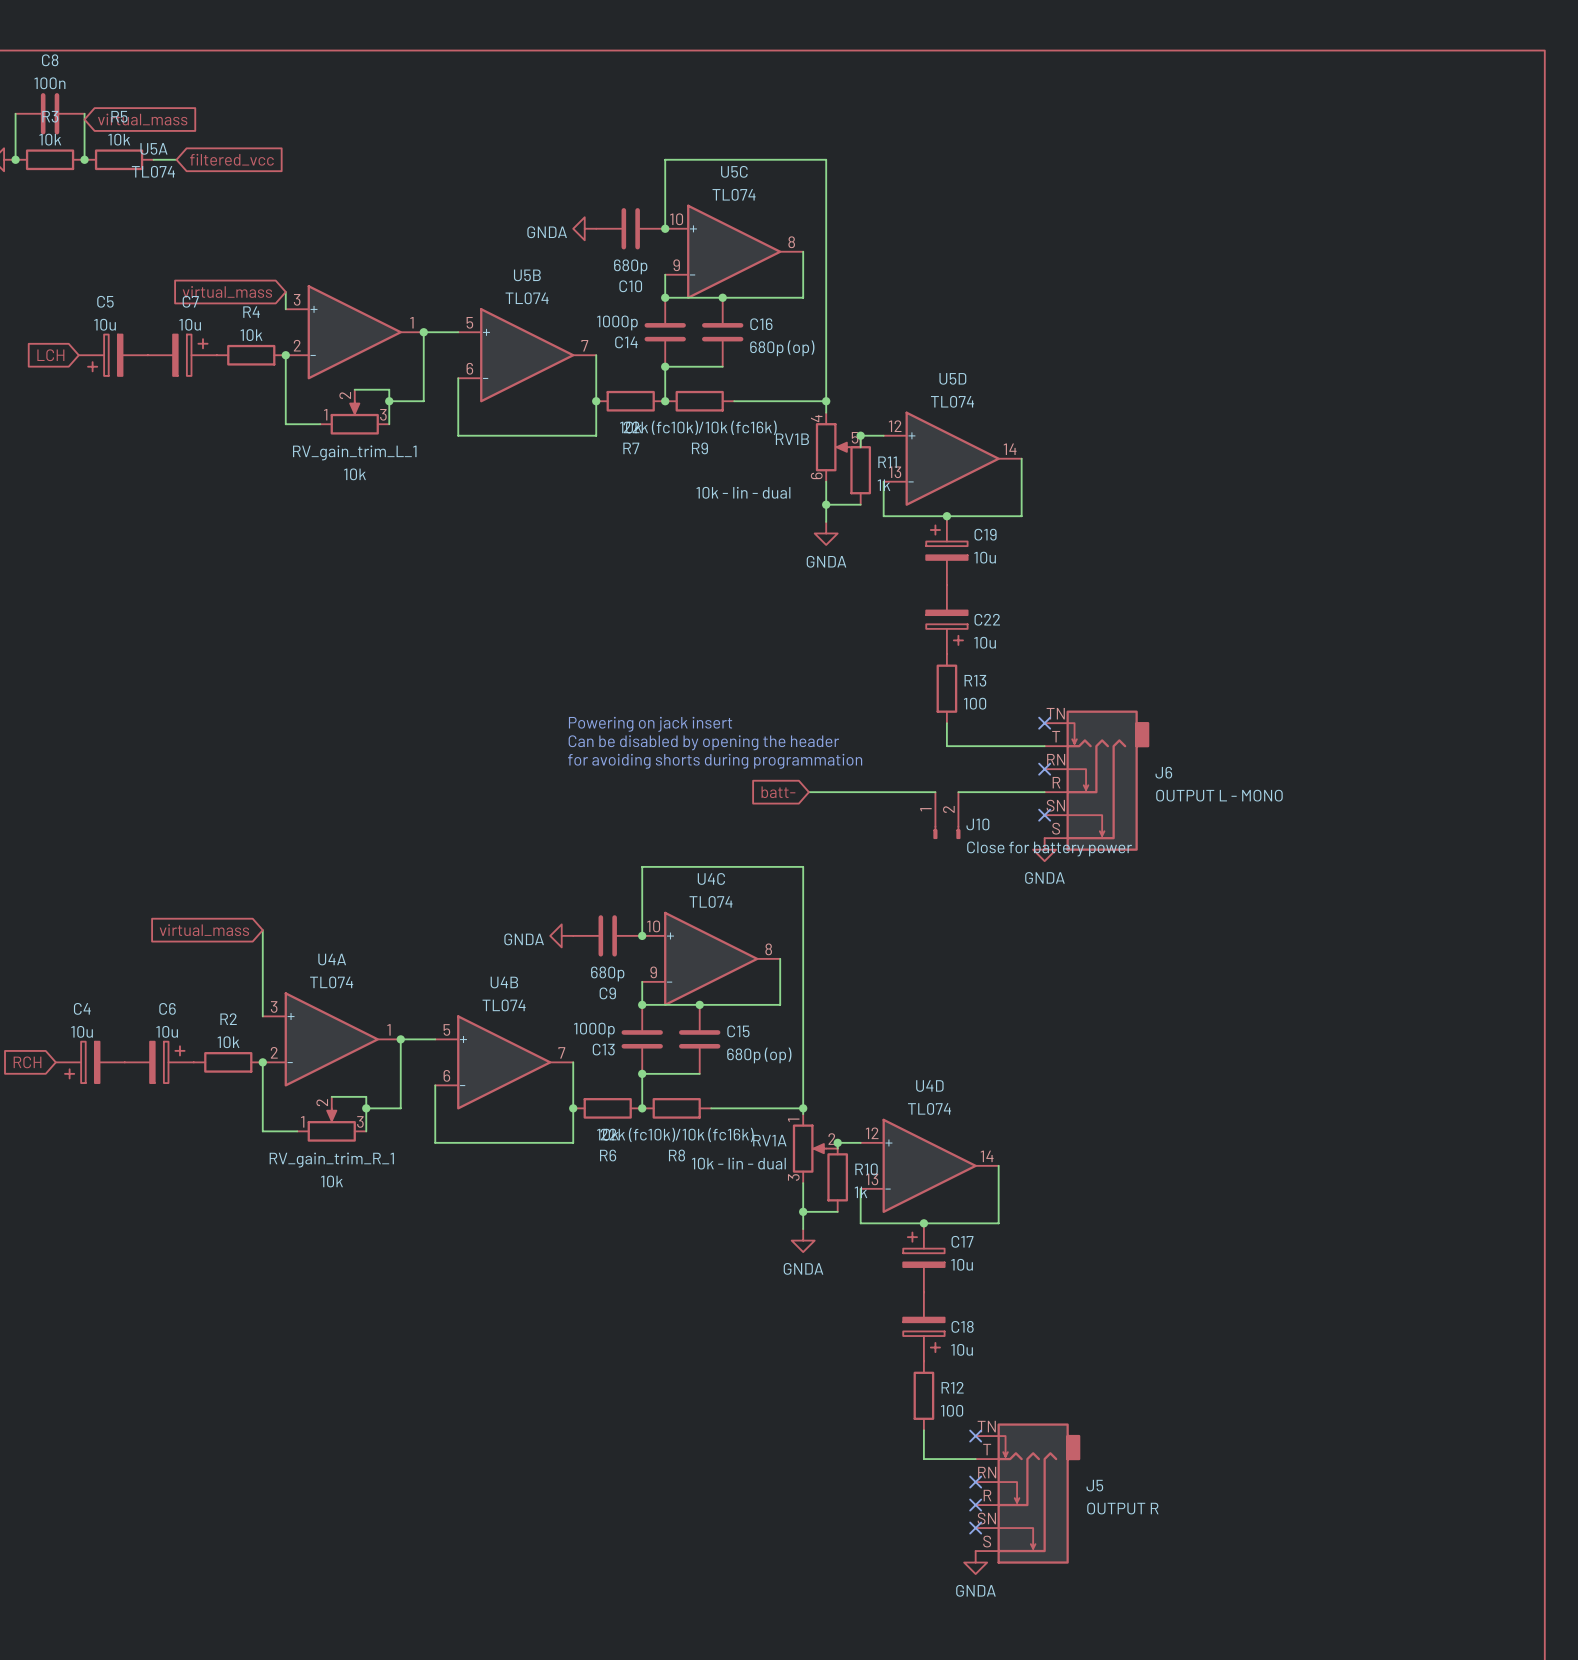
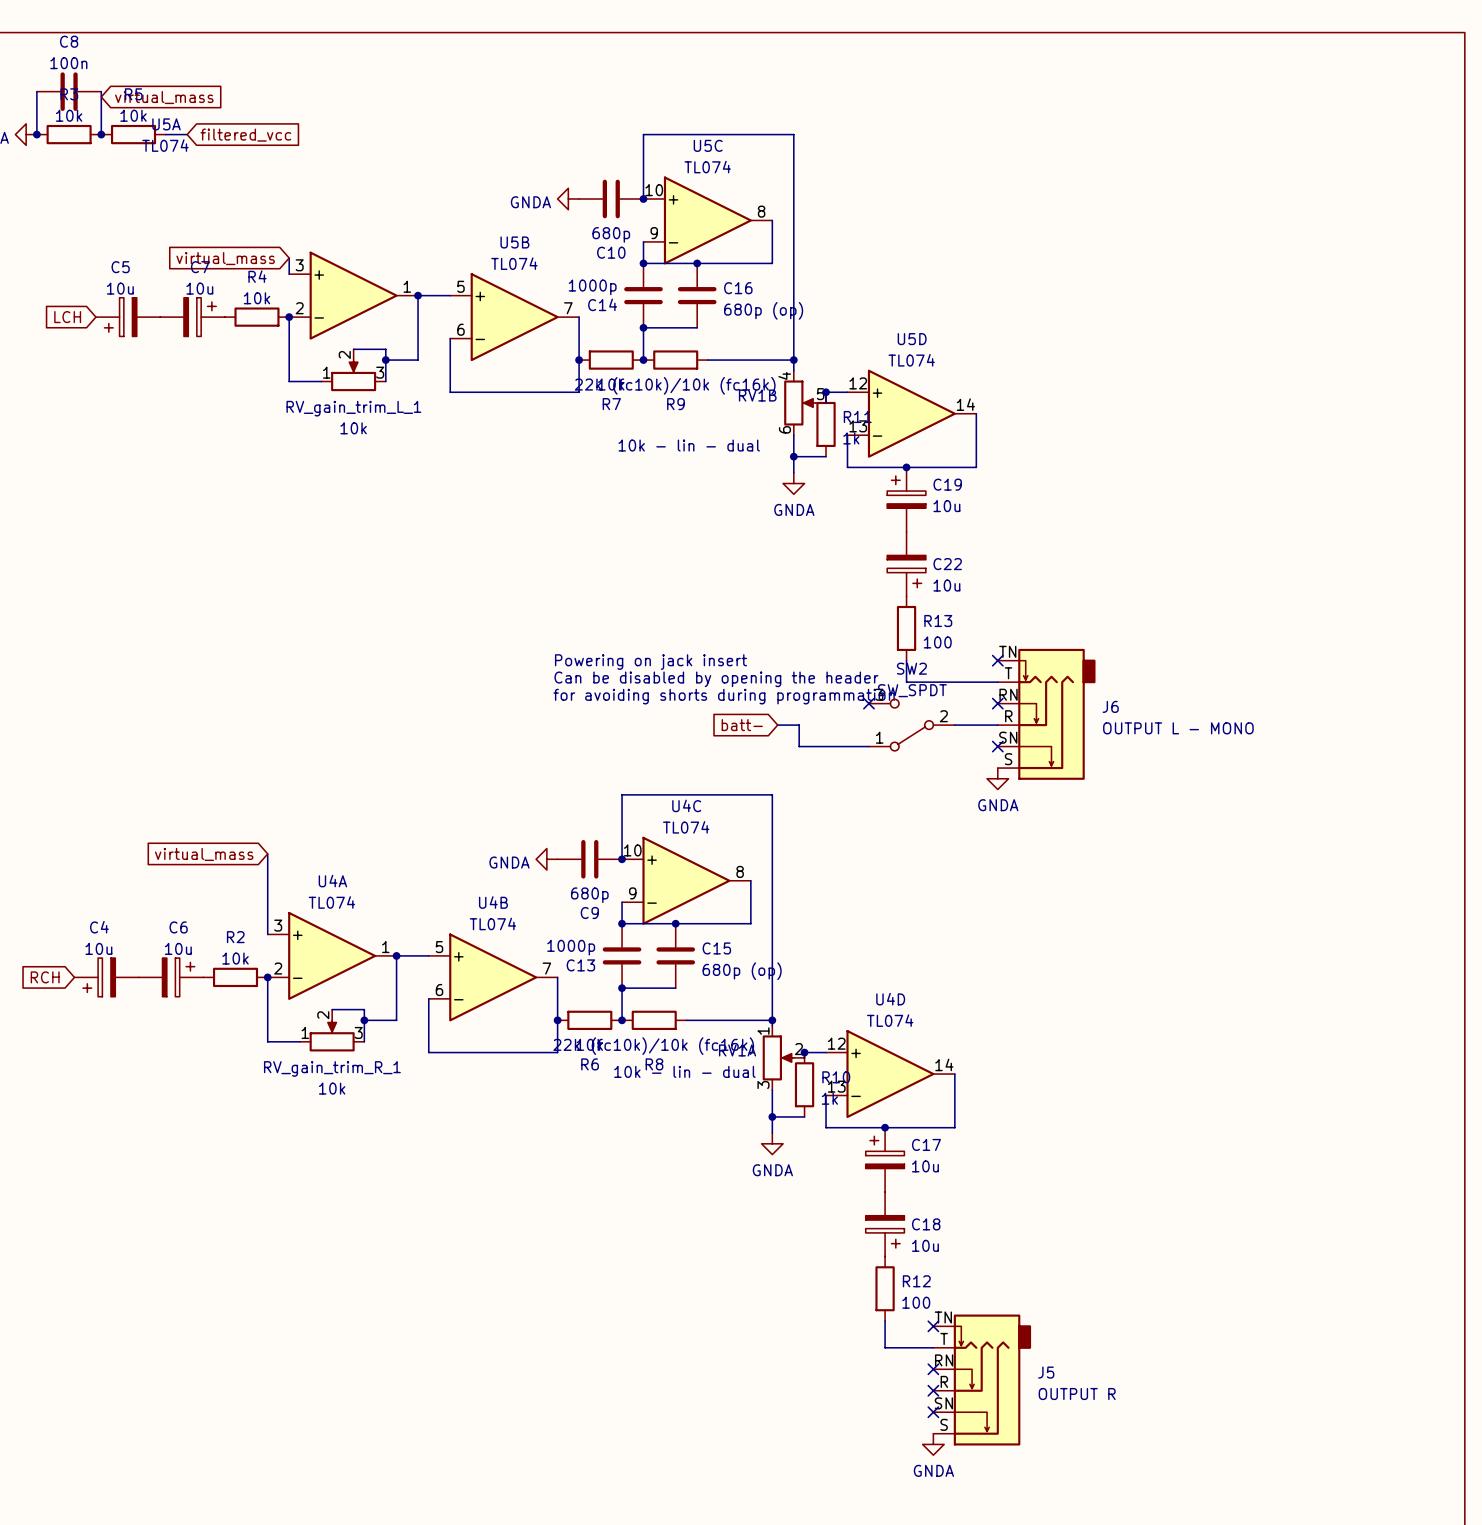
no-connect mark: none -> (868, 703)
wire: (831, 792) (935, 792) -> (799, 725) (799, 746) (868, 746)
SW2: none -> SW_SPDT (911, 725)
J10: Close for battery power (946, 815) -> none

